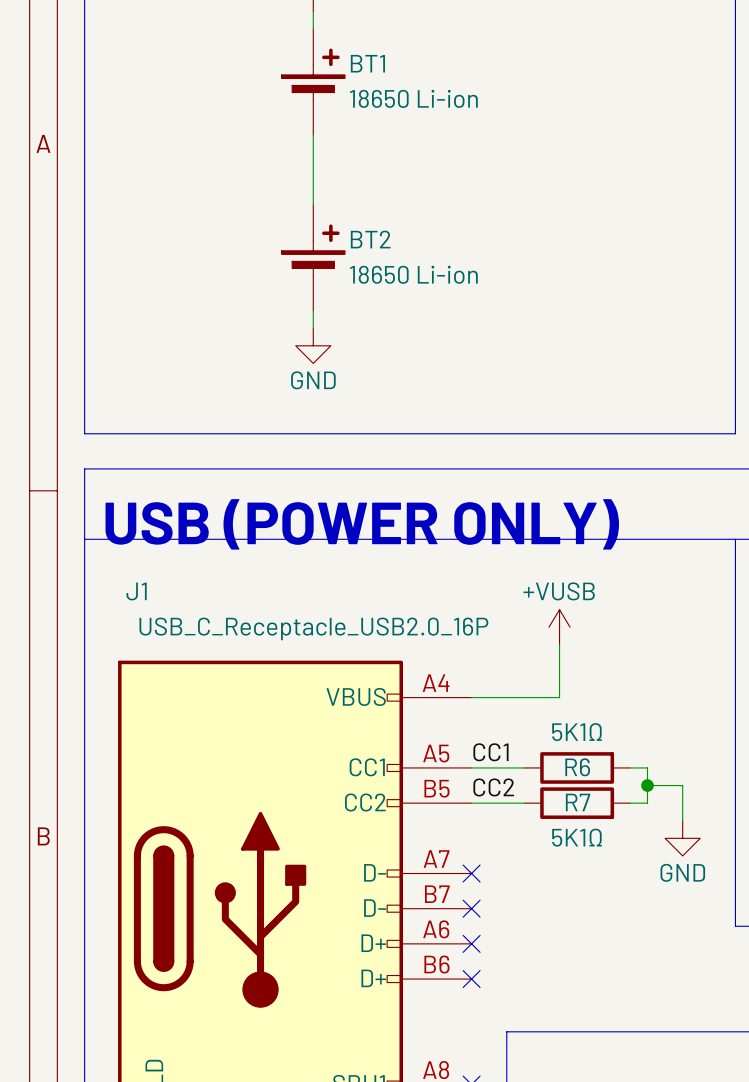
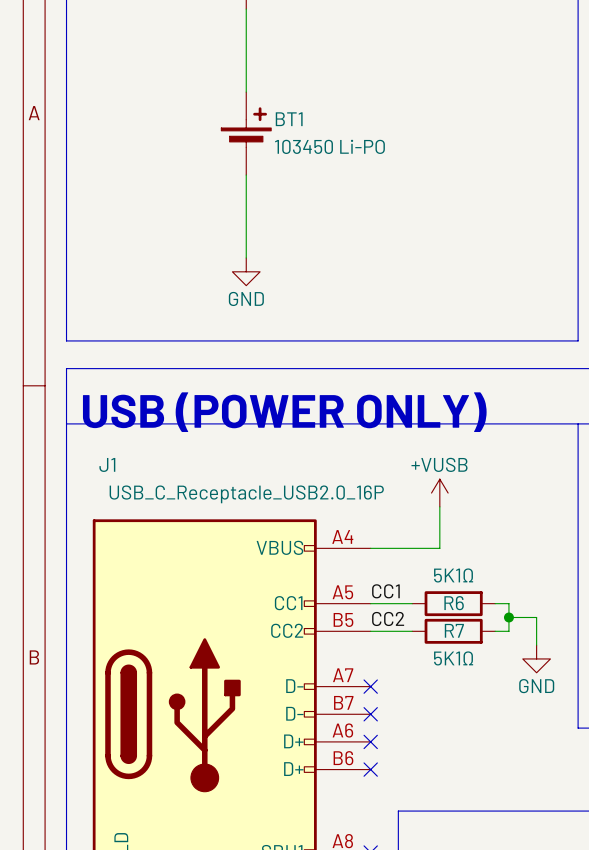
BT1 position: (313, 81) -> (246, 133)
BT1 value: 18650 Li-ion (413, 98) -> 103450 Li-PO (329, 146)
BT2: 18650 Li-ion (313, 257) -> none

